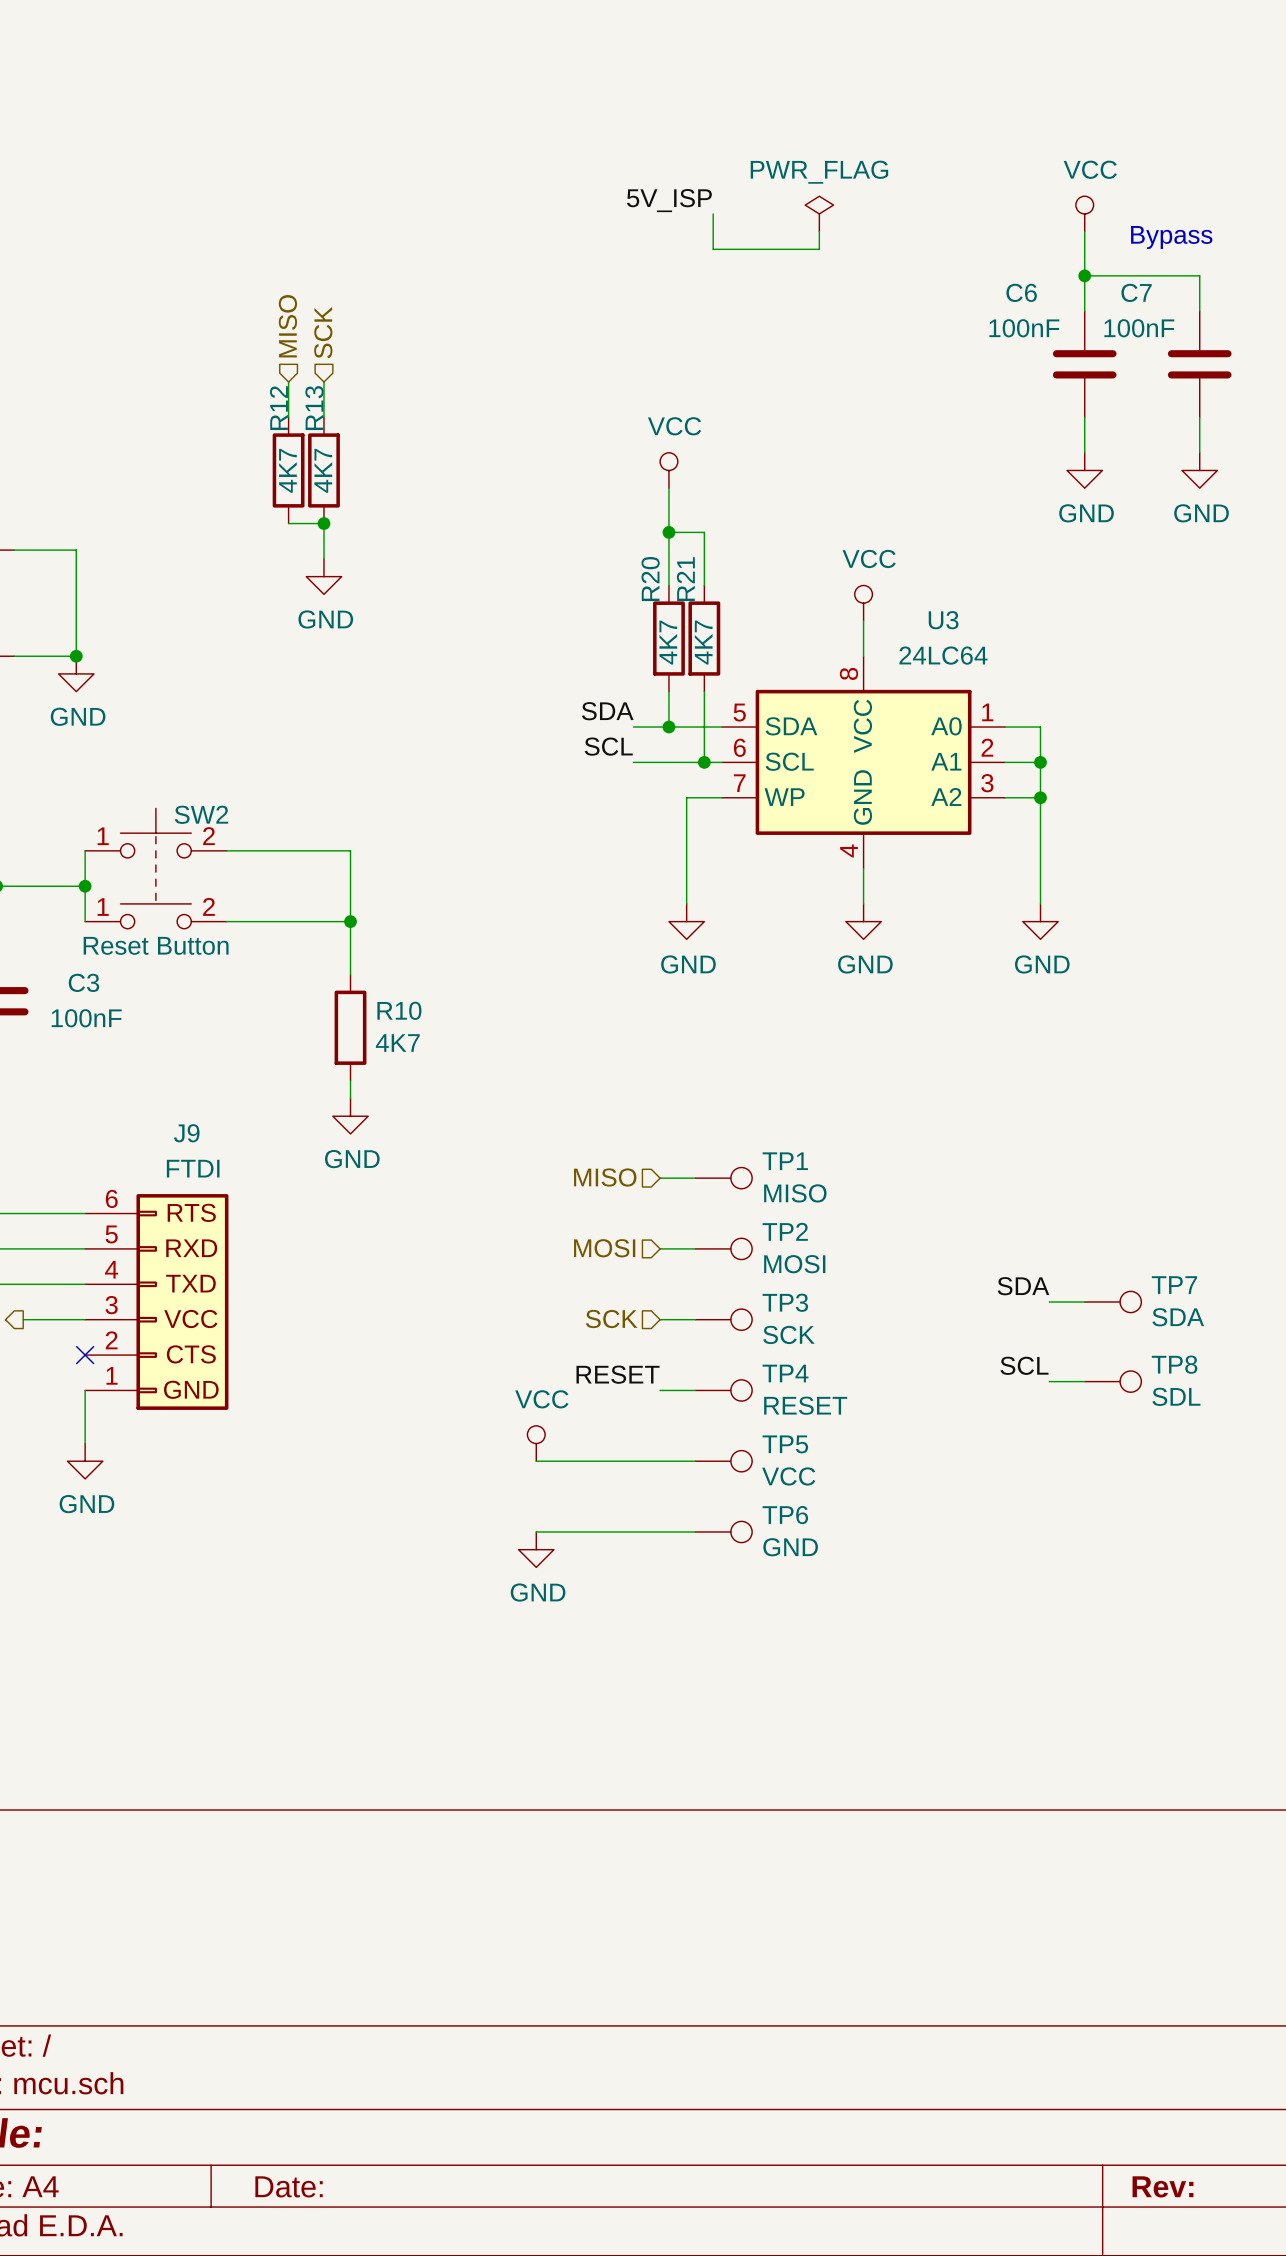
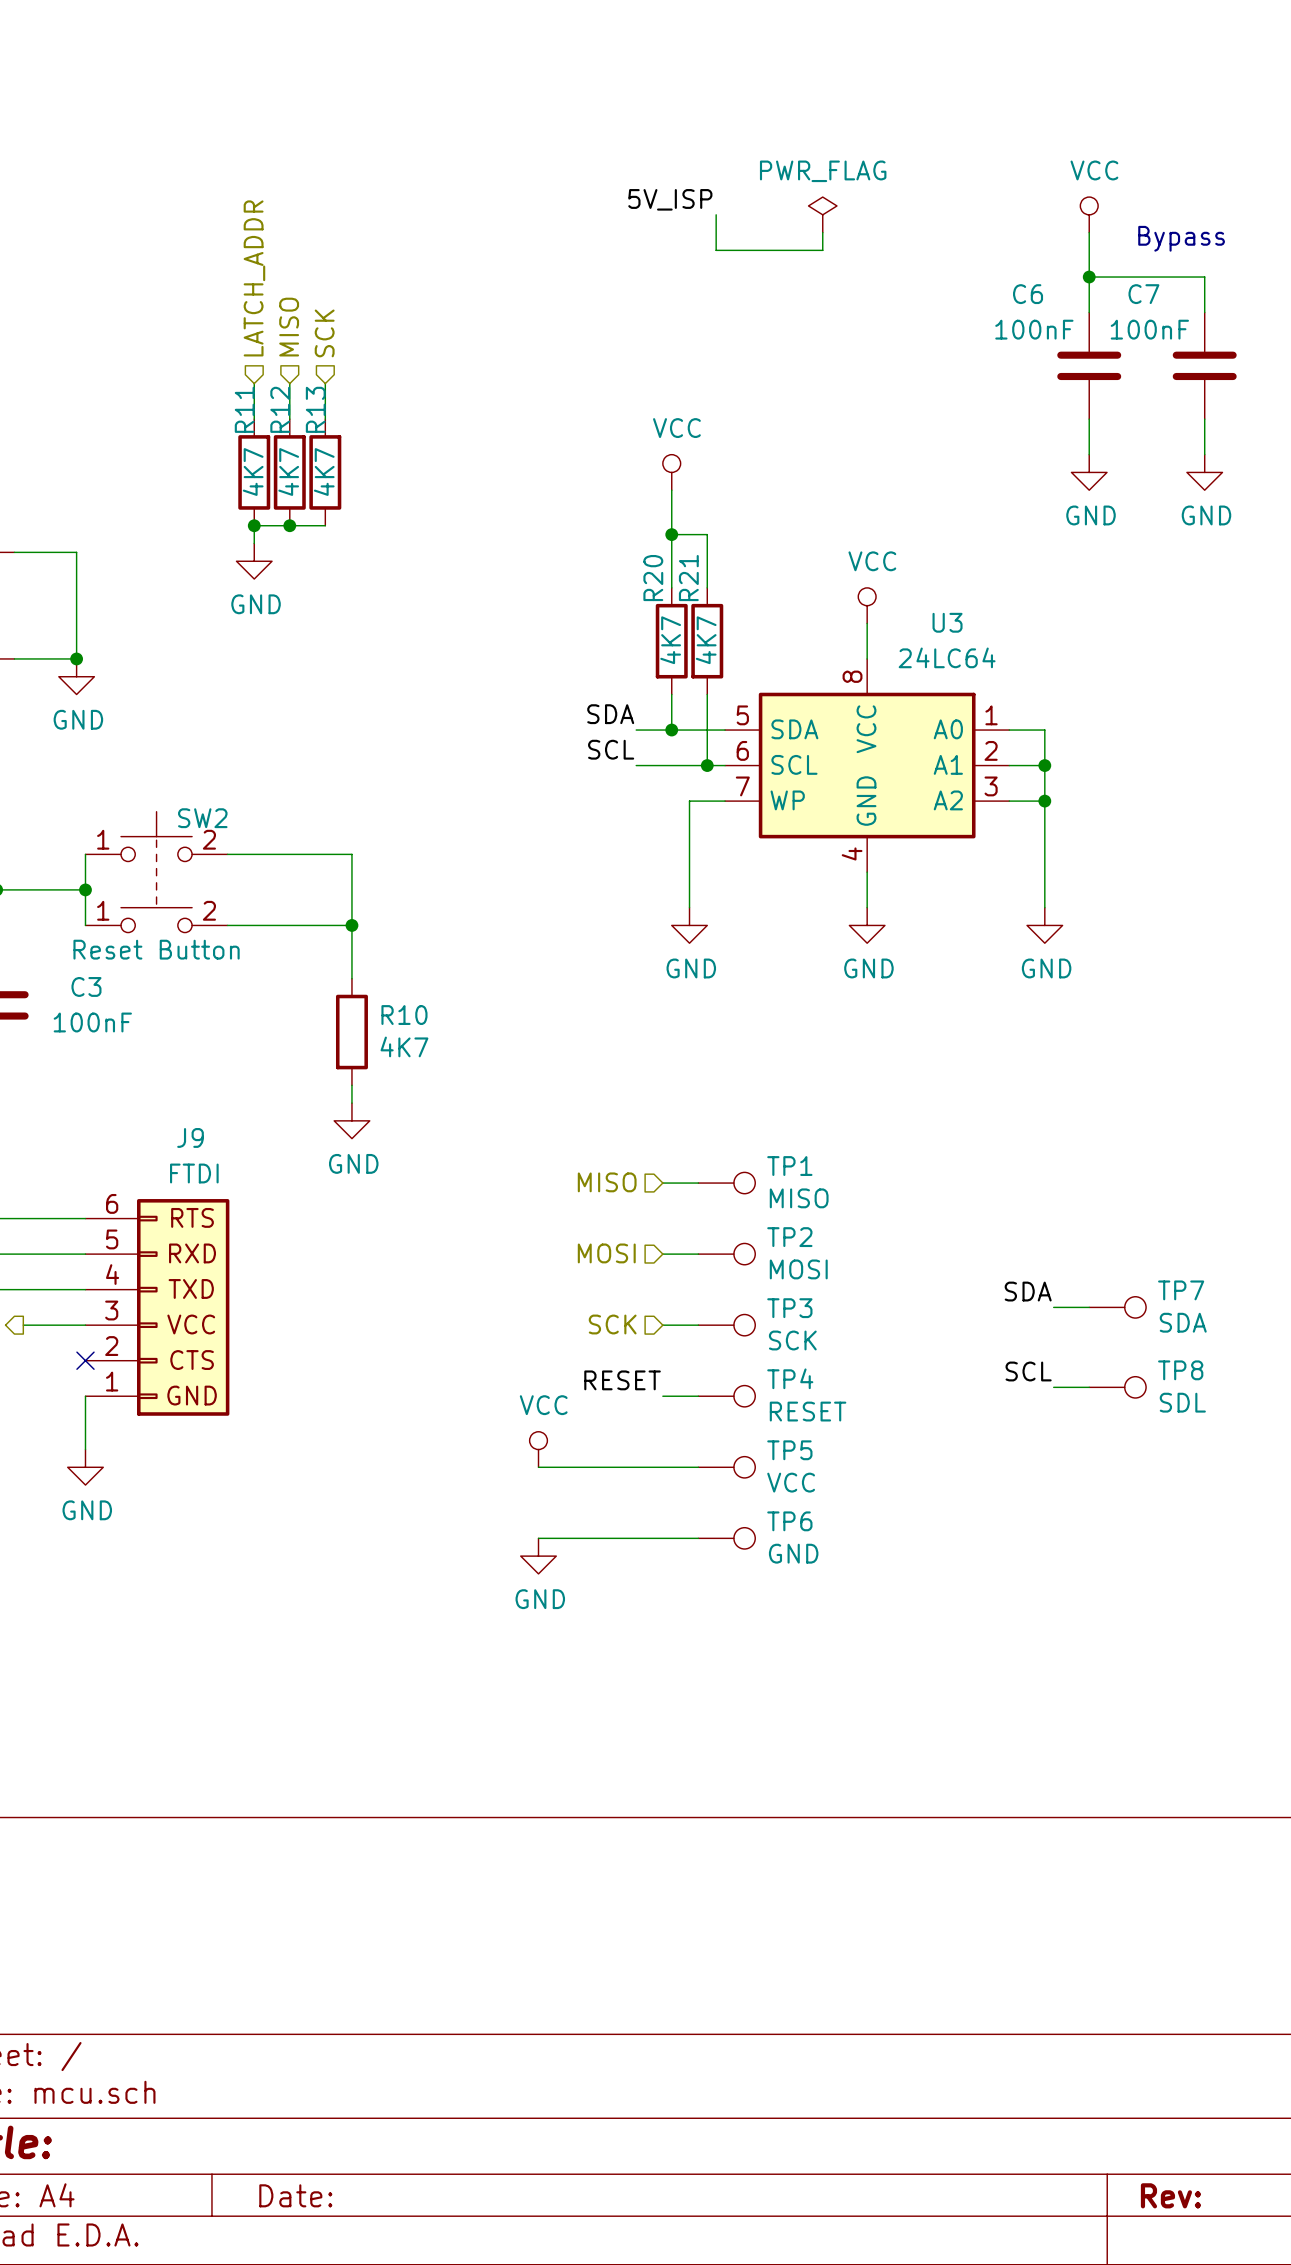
hierarchical label: none -> LATCH_ADDR (254, 278)
R11: none -> 4K7 (254, 472)
junction: none -> (254, 525)
wire: none -> (289, 525) (254, 525) (254, 543)
junction: none -> (289, 525)
wire: (323, 523) (323, 558) -> (254, 383) (254, 419)
junction: (323, 523) -> none
power symbol position: GND (323, 576) -> GND (254, 561)

